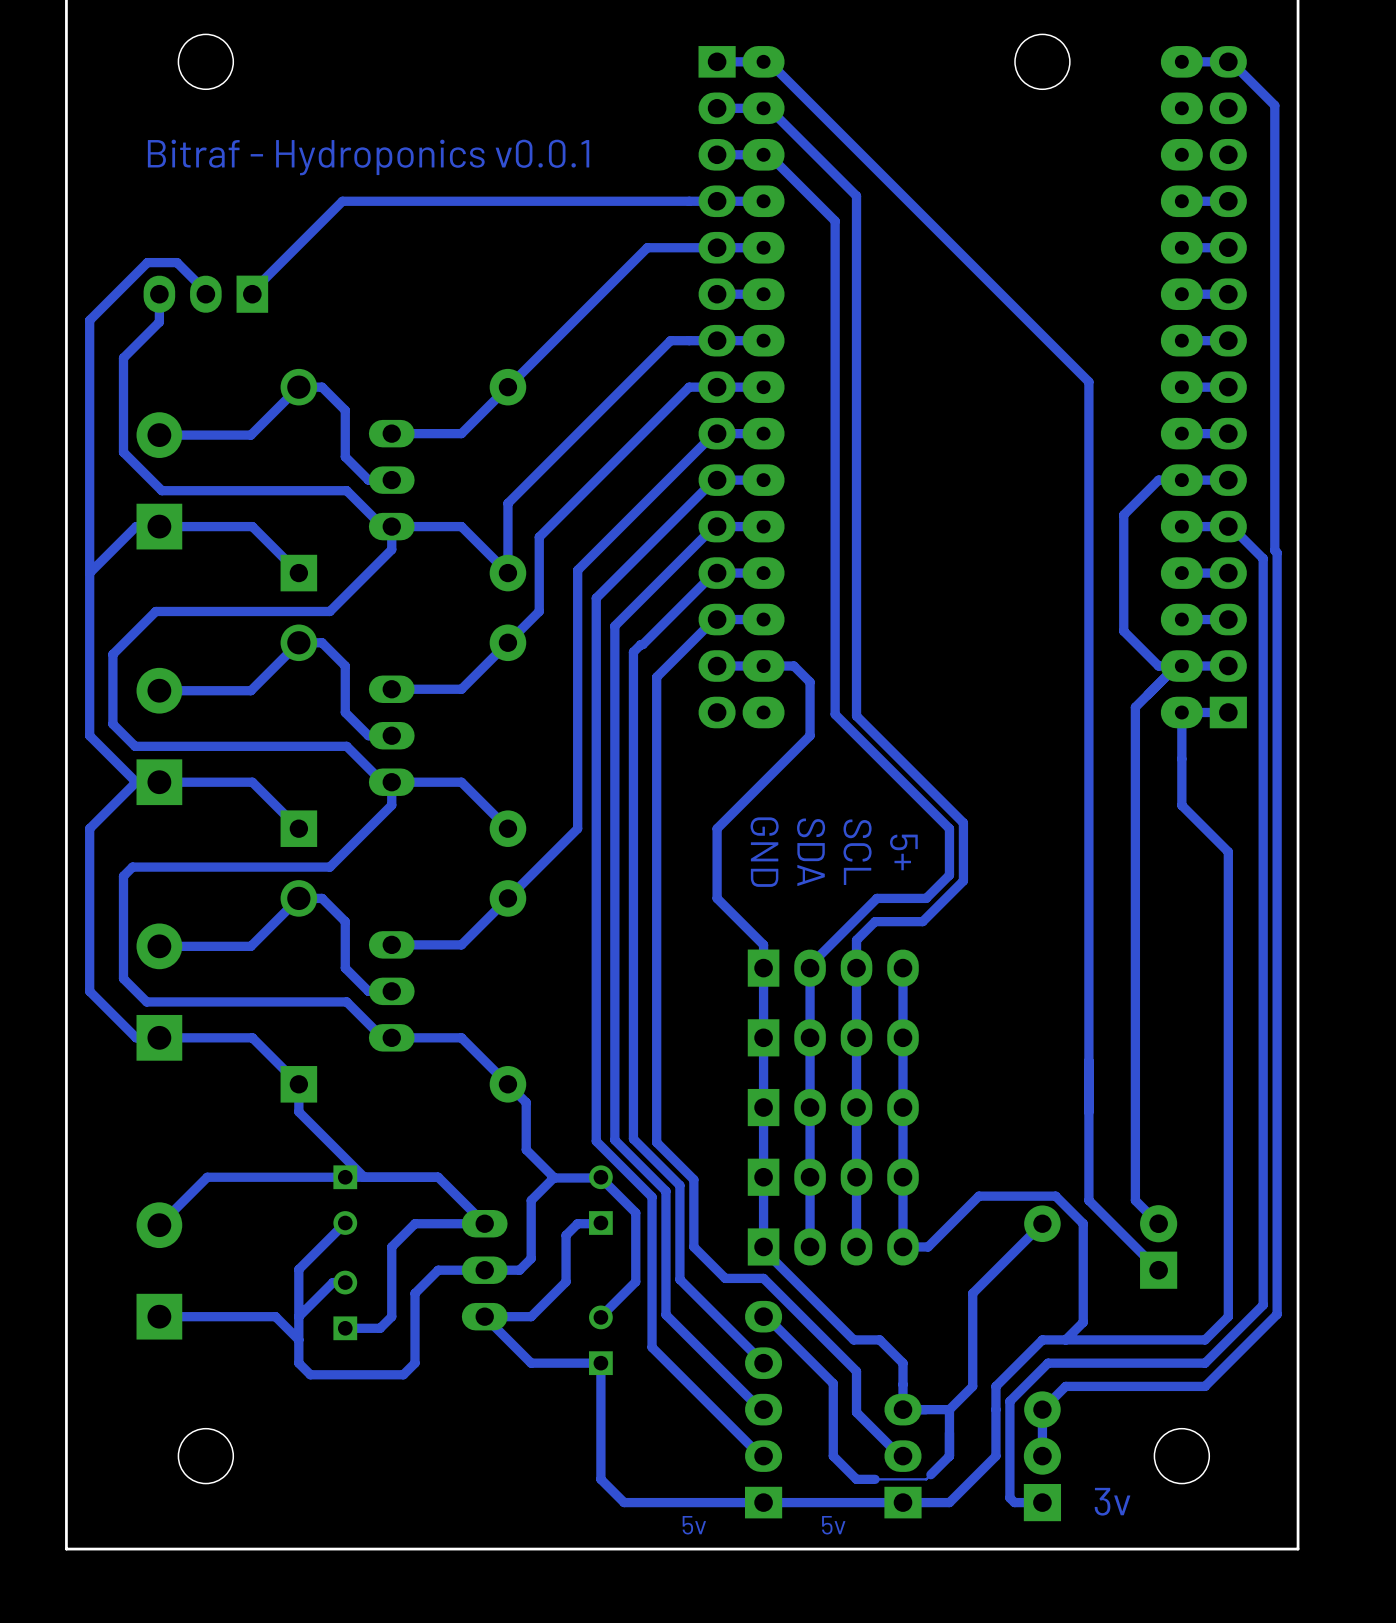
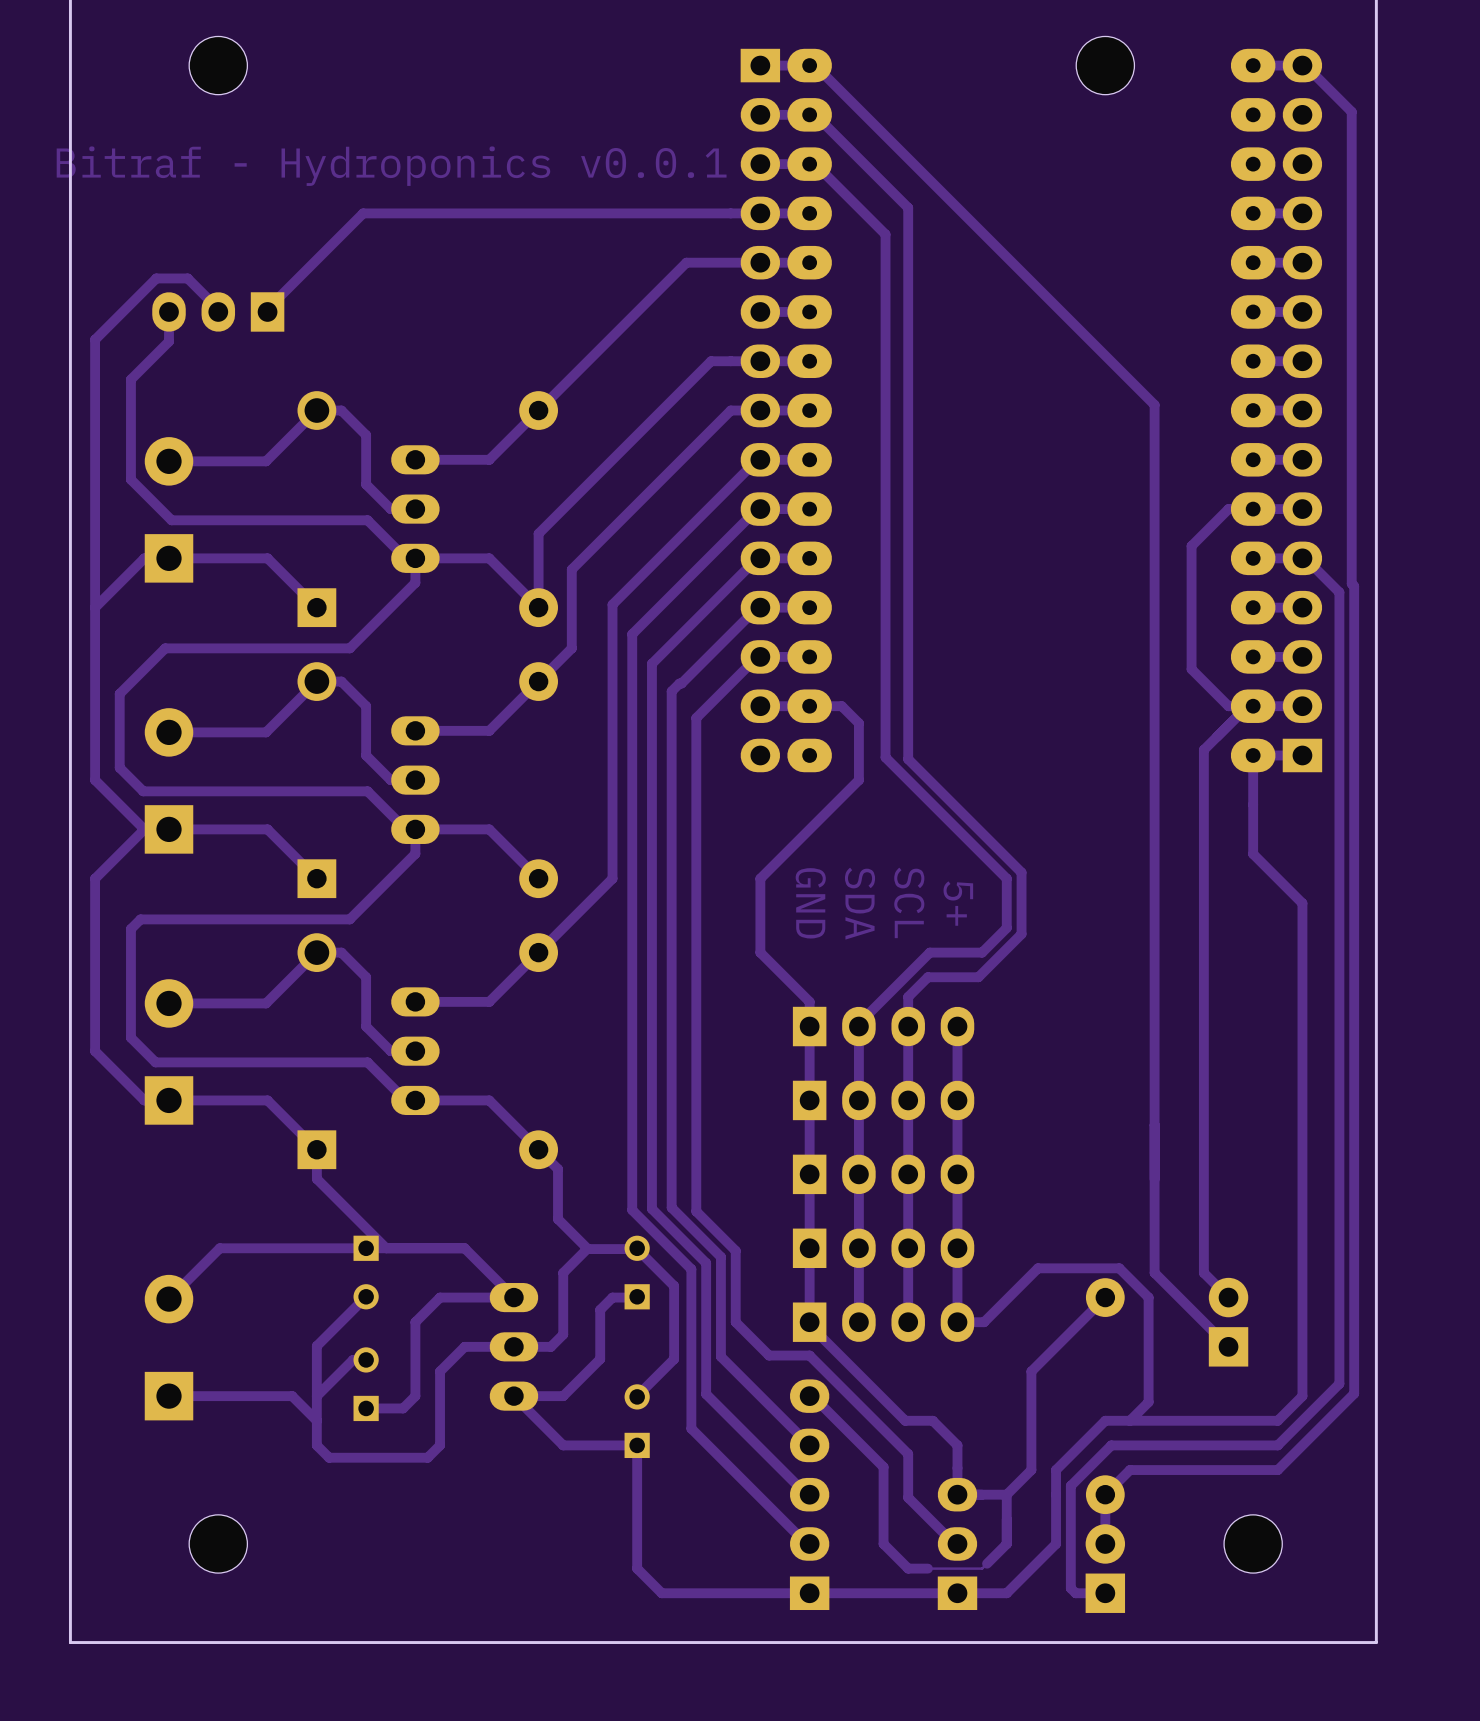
text: 3v (1112, 1501) -> none
text: 5v (694, 1525) -> none
text: 5v (833, 1525) -> none

